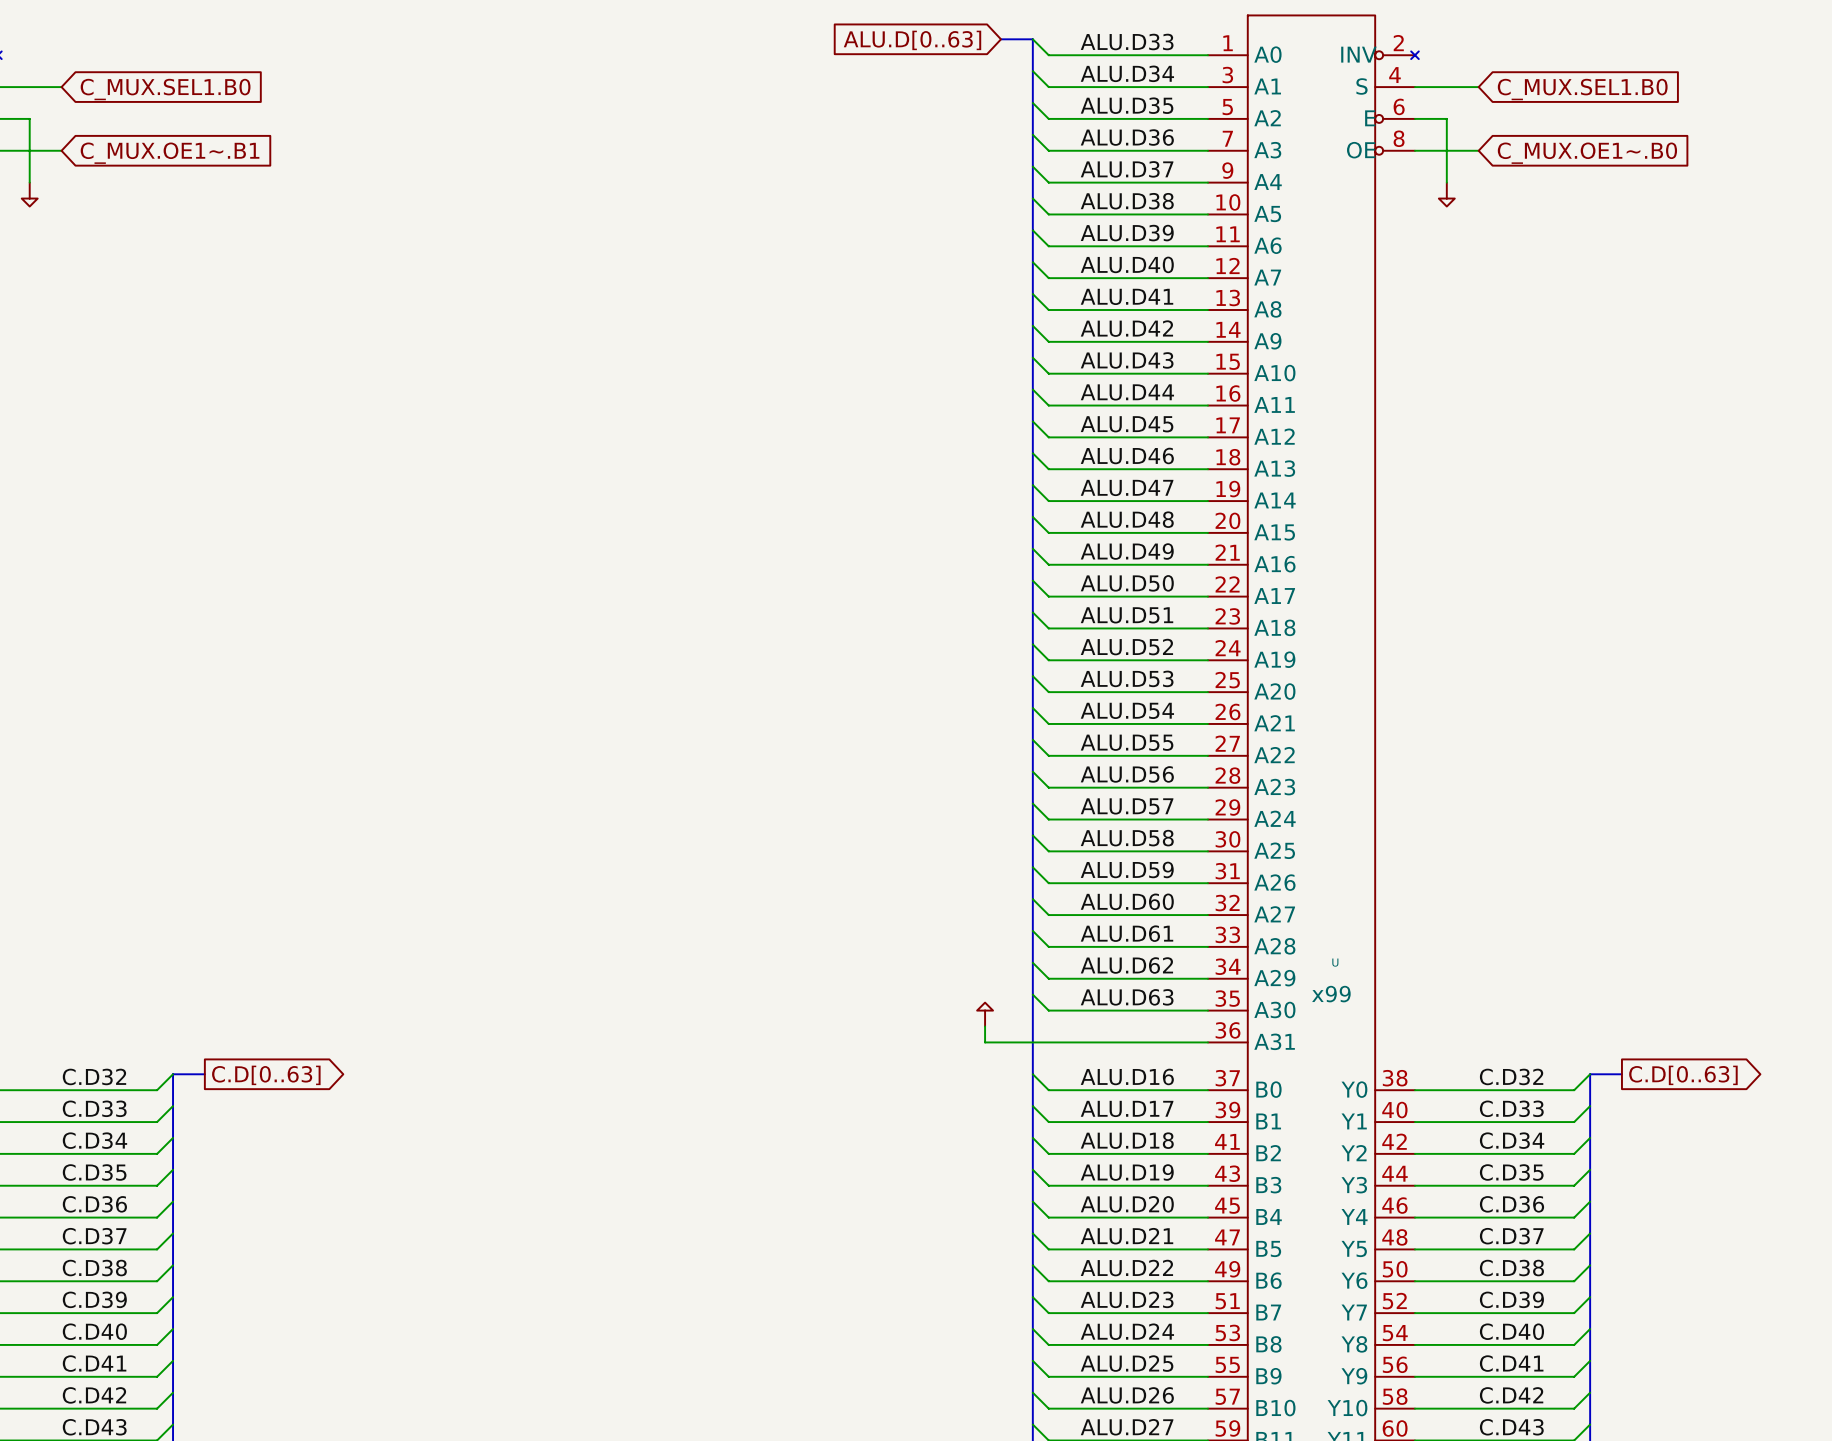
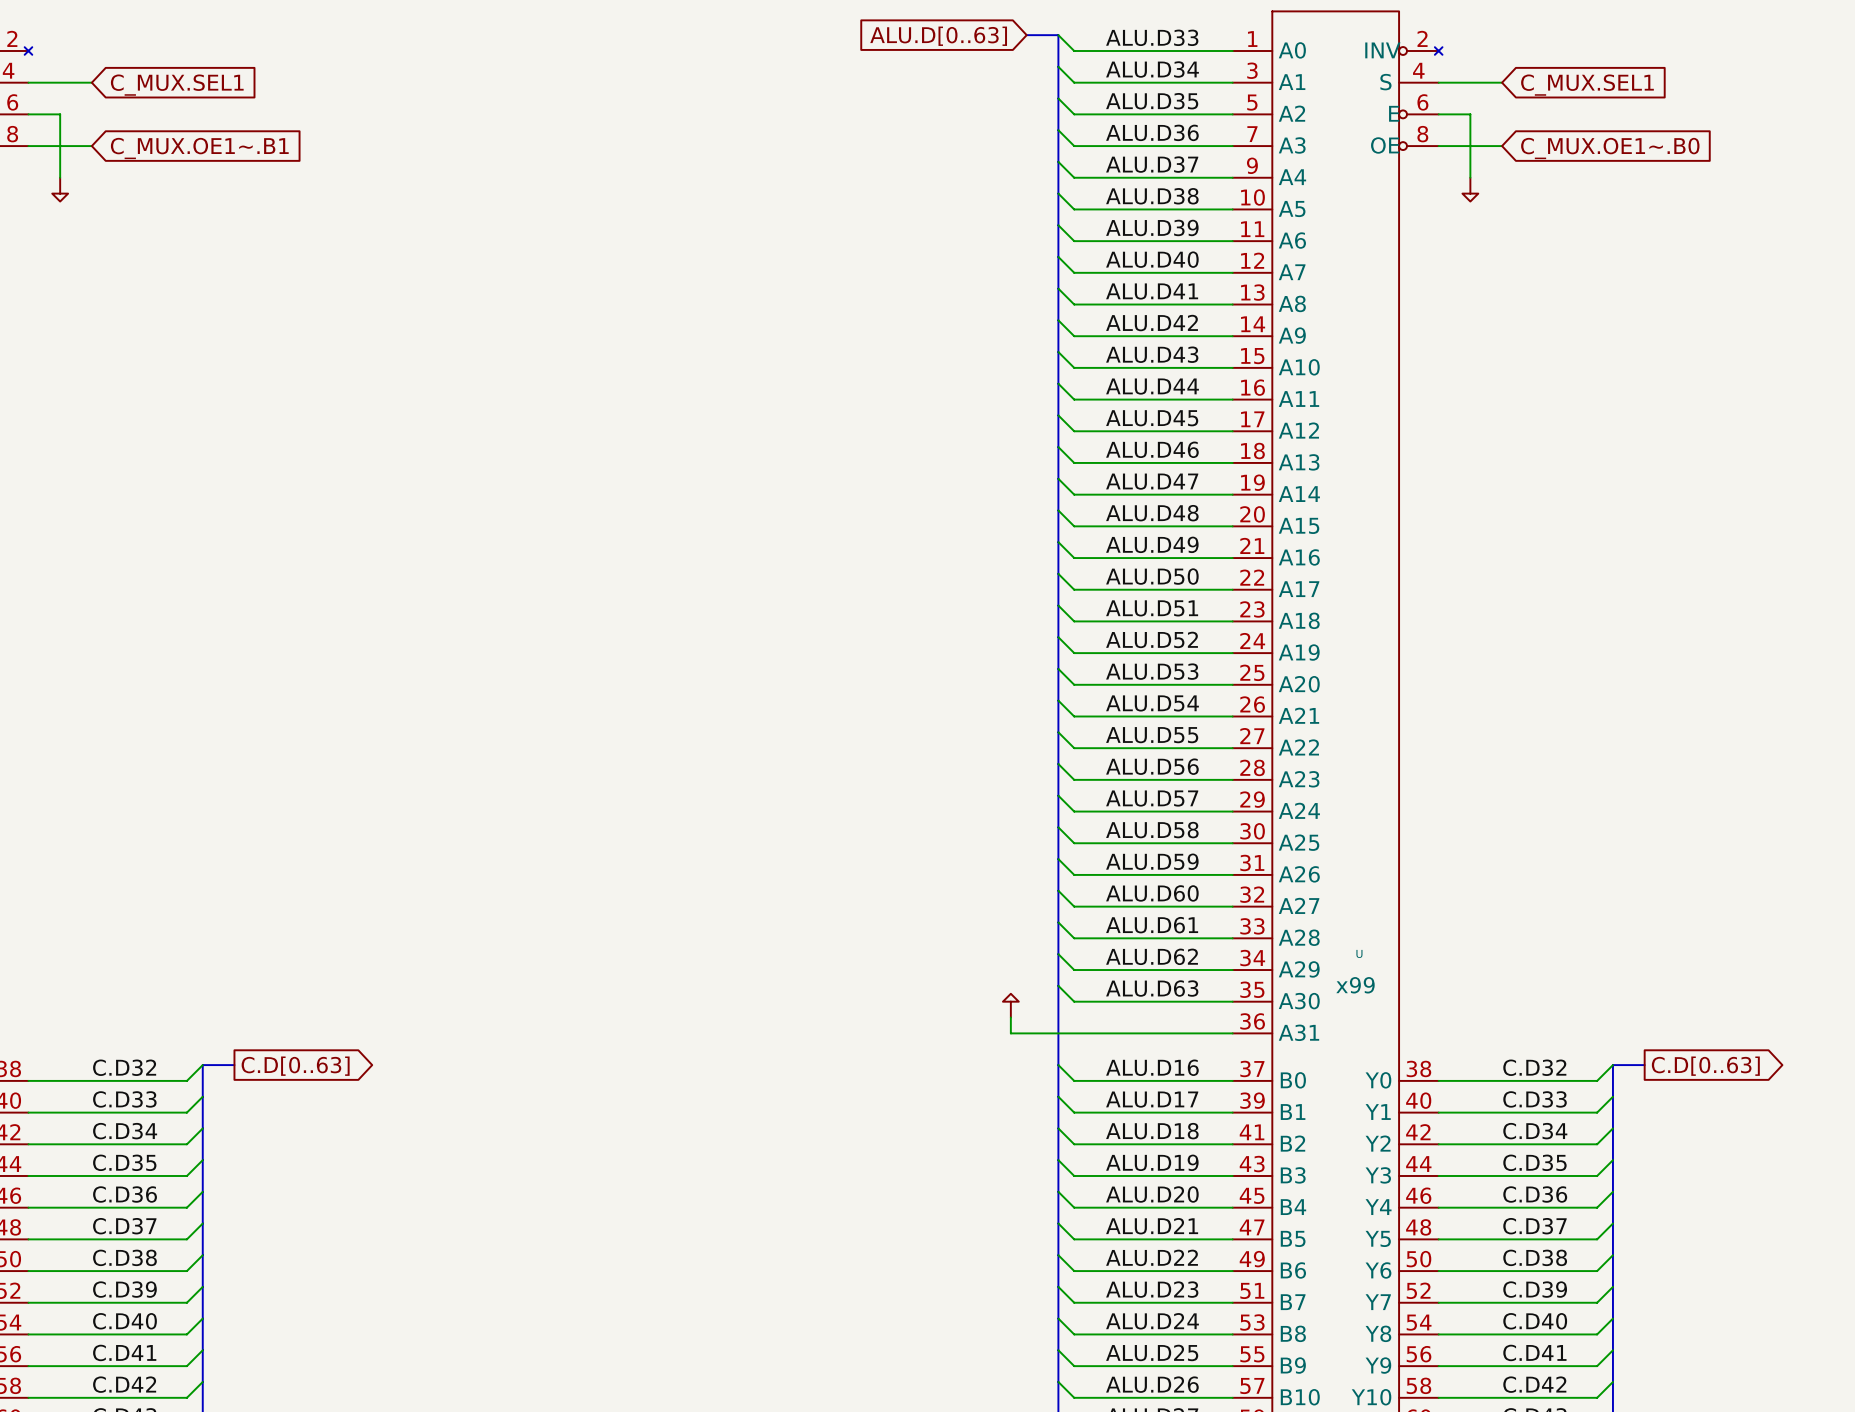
global label: C_MUX.SEL1.B0 (165, 89) -> C_MUX.SEL1 (177, 85)
global label: C_MUX.SEL1.B0 (1582, 89) -> C_MUX.SEL1 (1587, 85)

